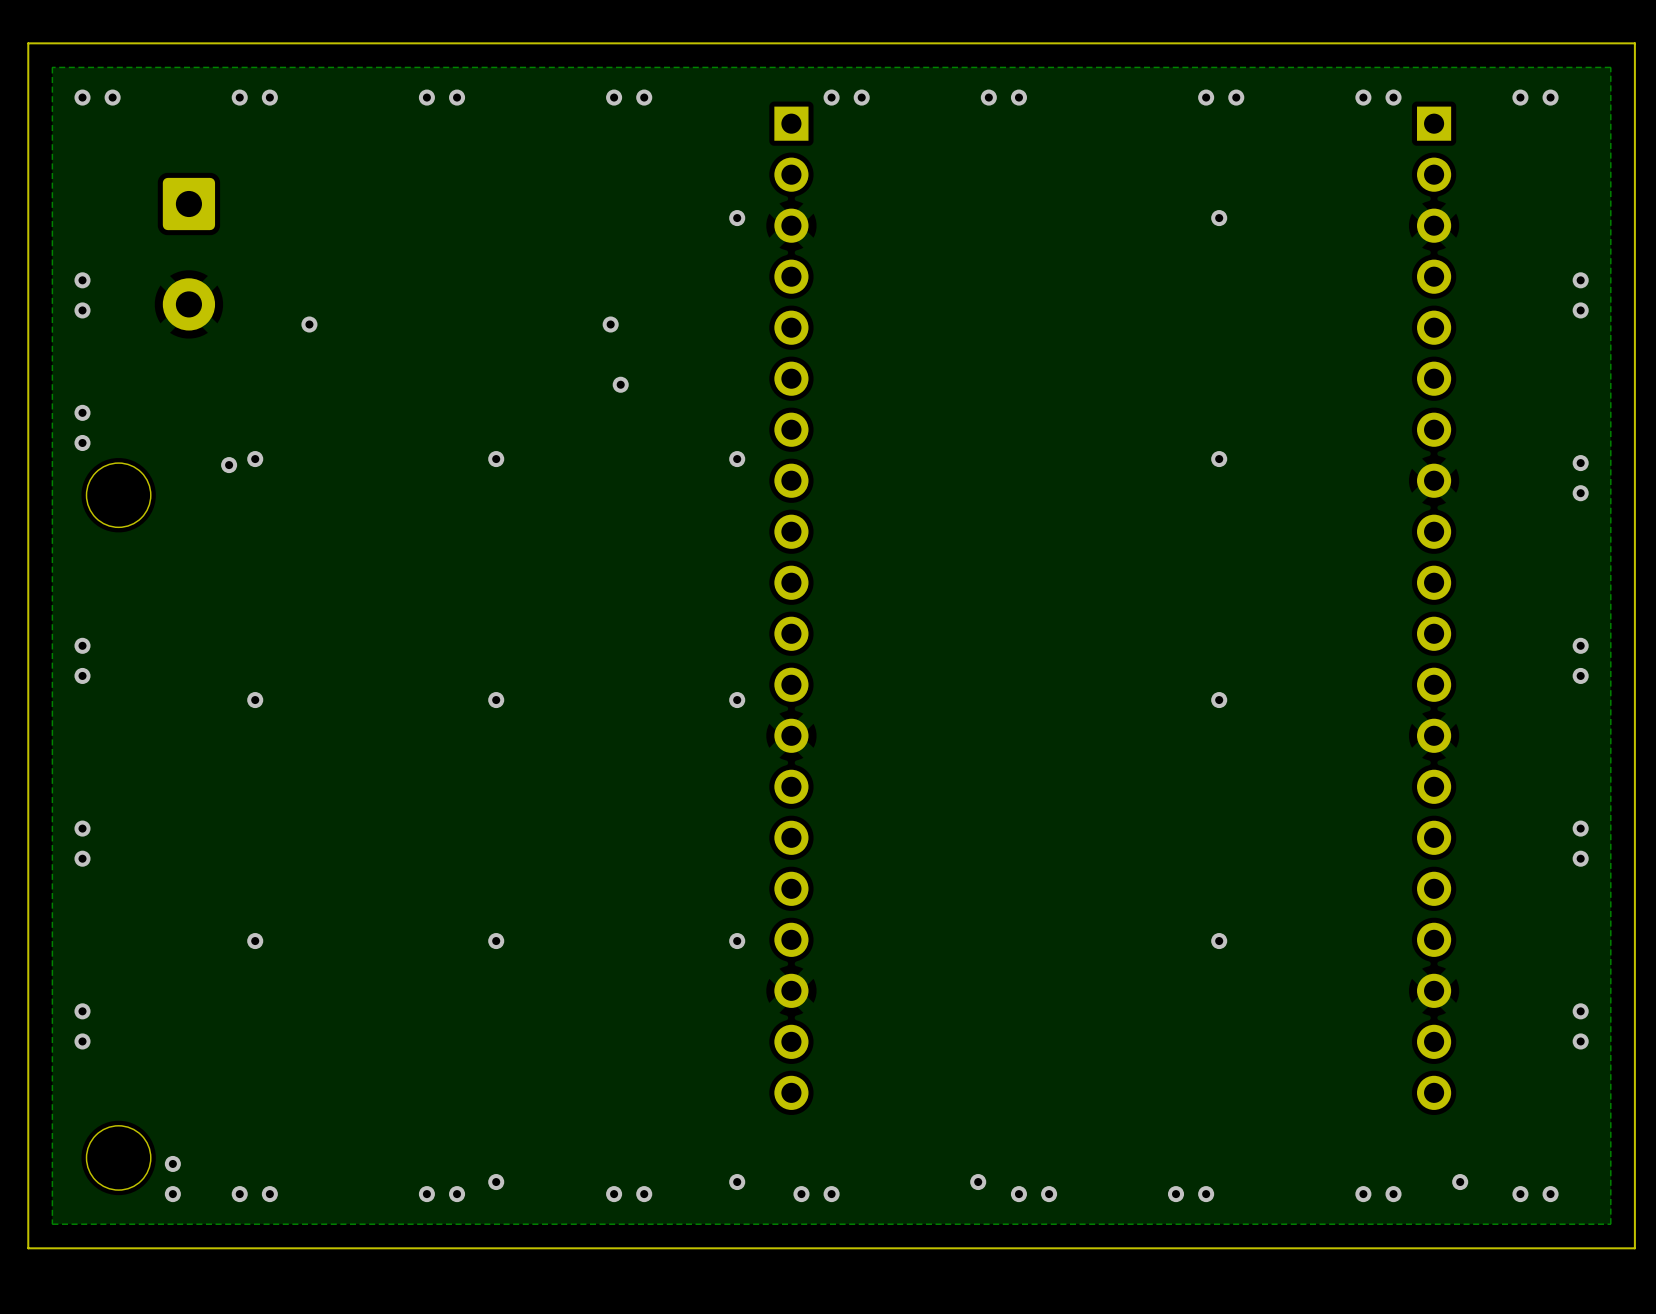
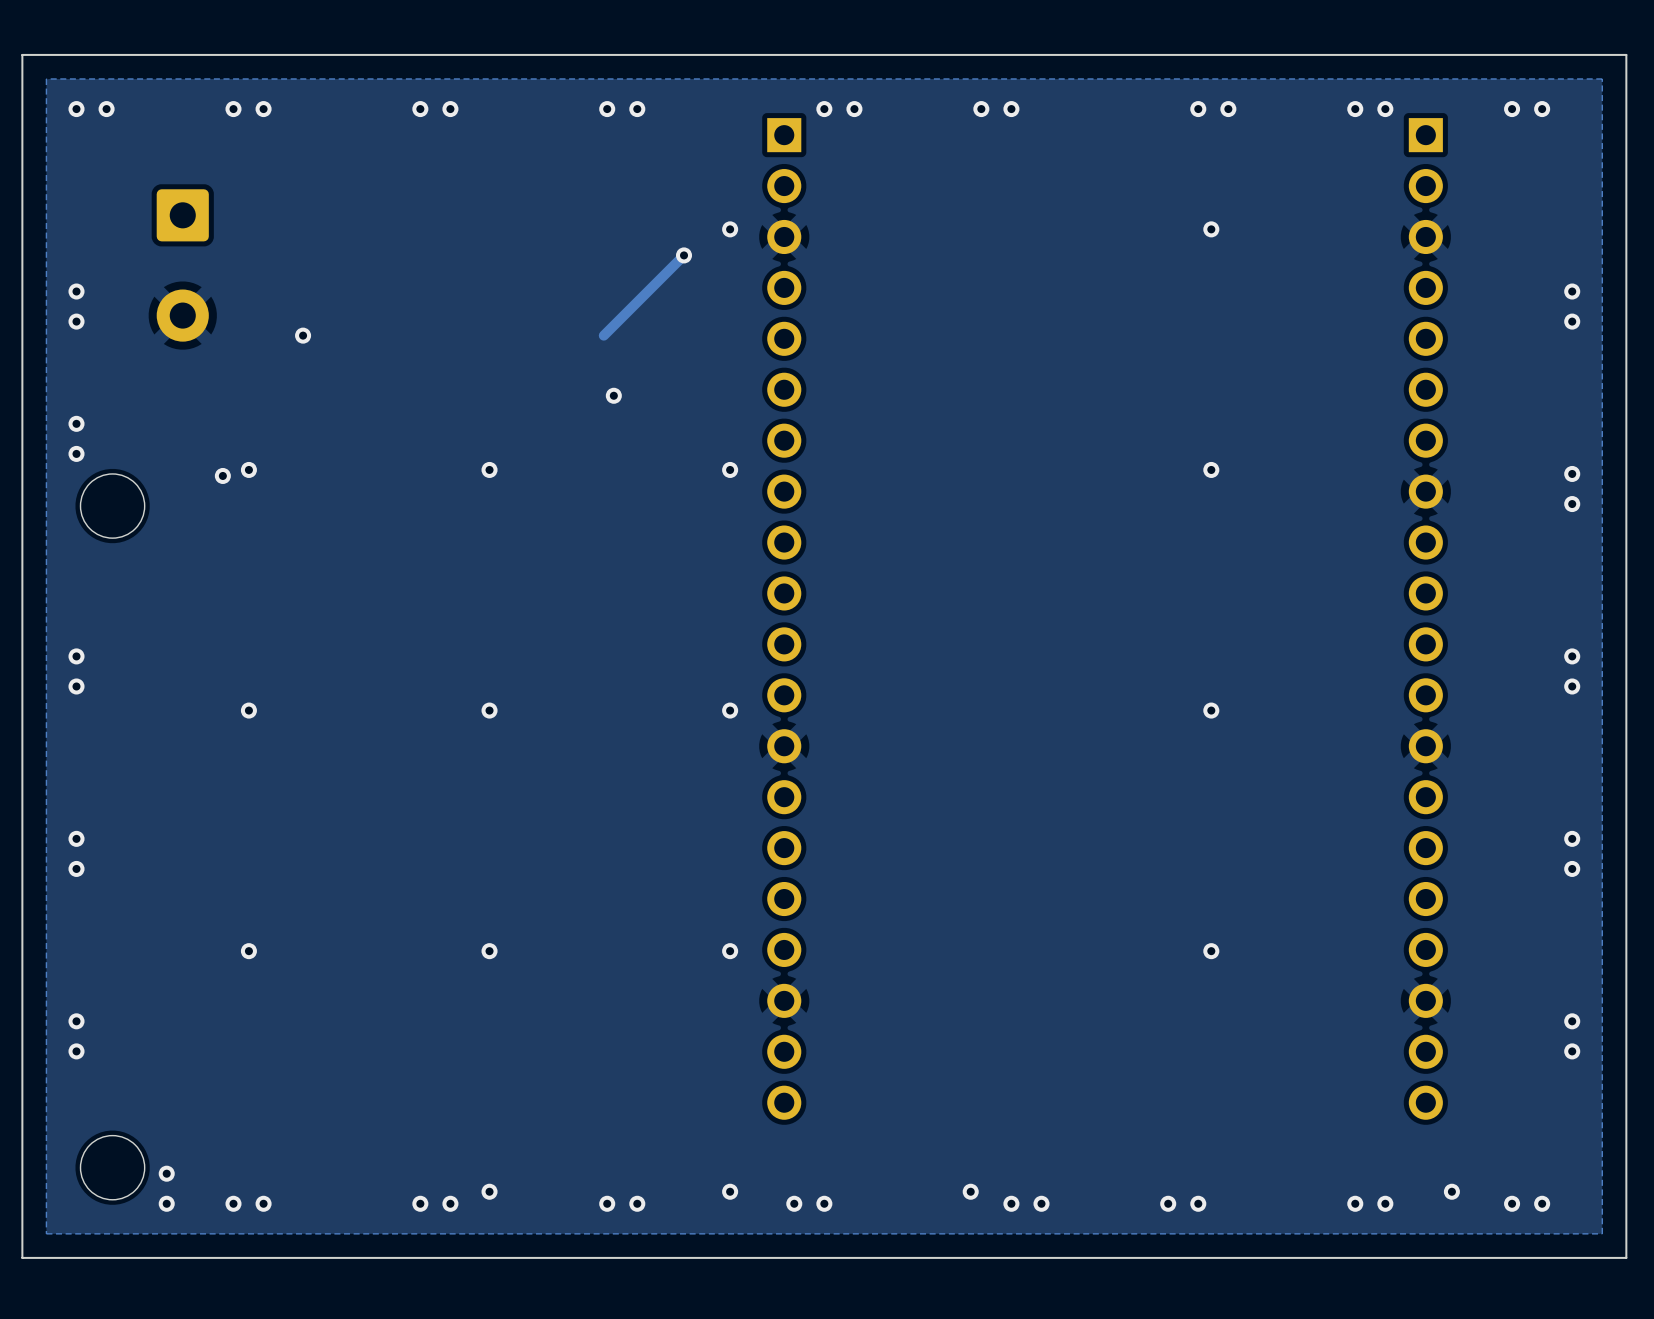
track: none -> (684, 255) (603, 335)
via position: (610, 324) -> (684, 255)

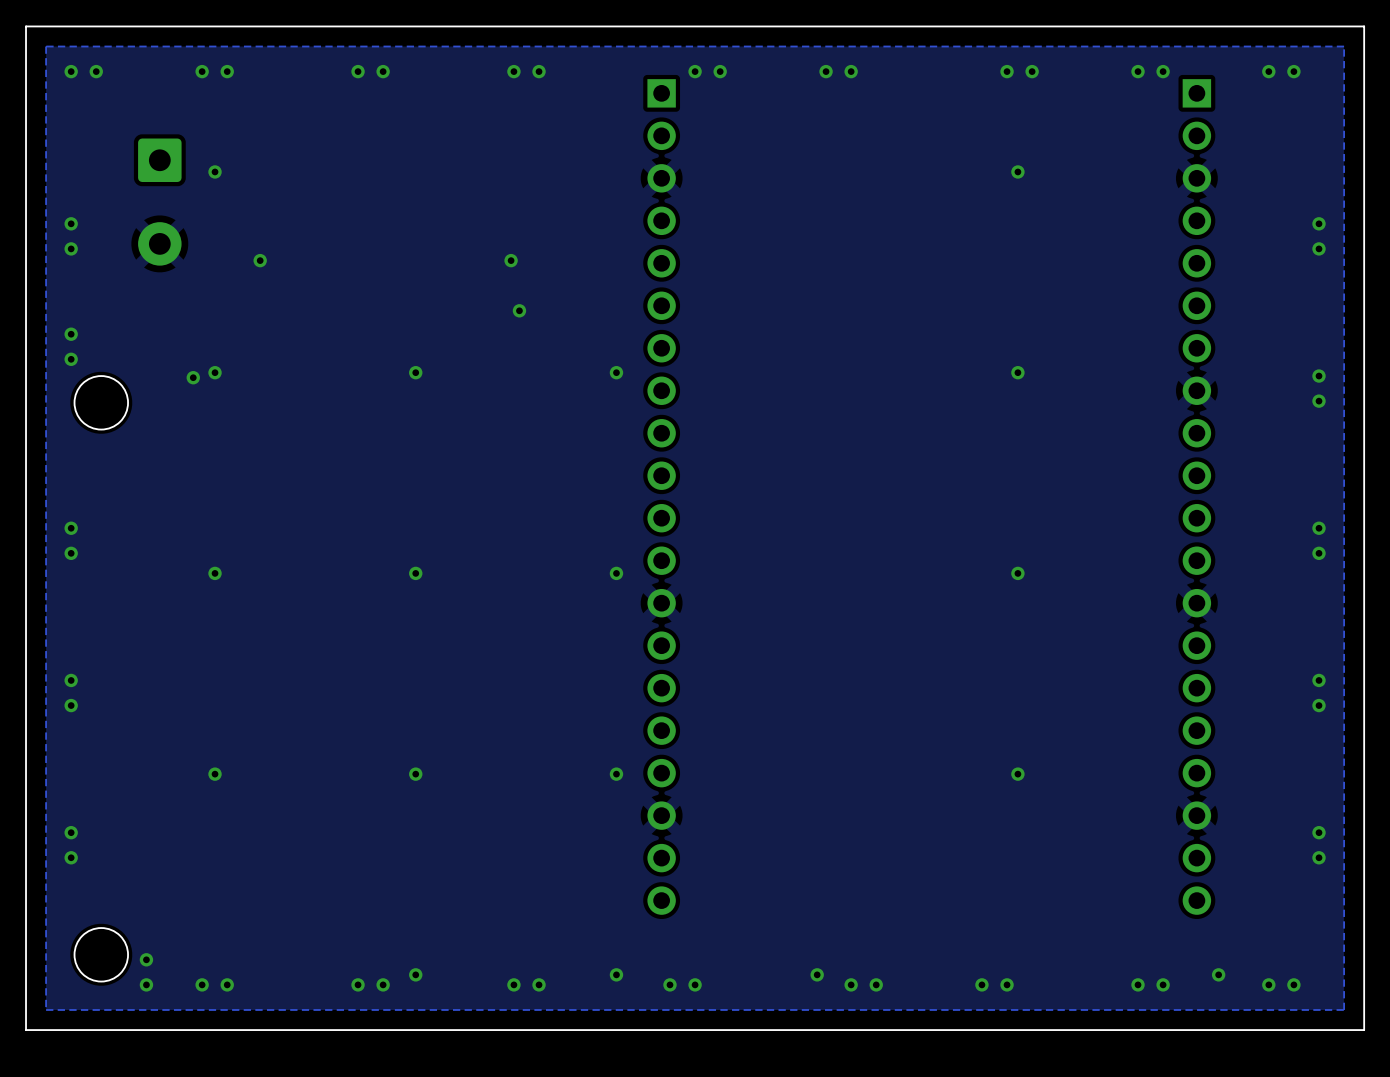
via: none -> (215, 171)
via: (730, 229) -> none
track: (684, 255) (603, 335) -> none
via: (684, 255) -> none
via: none -> (511, 260)

